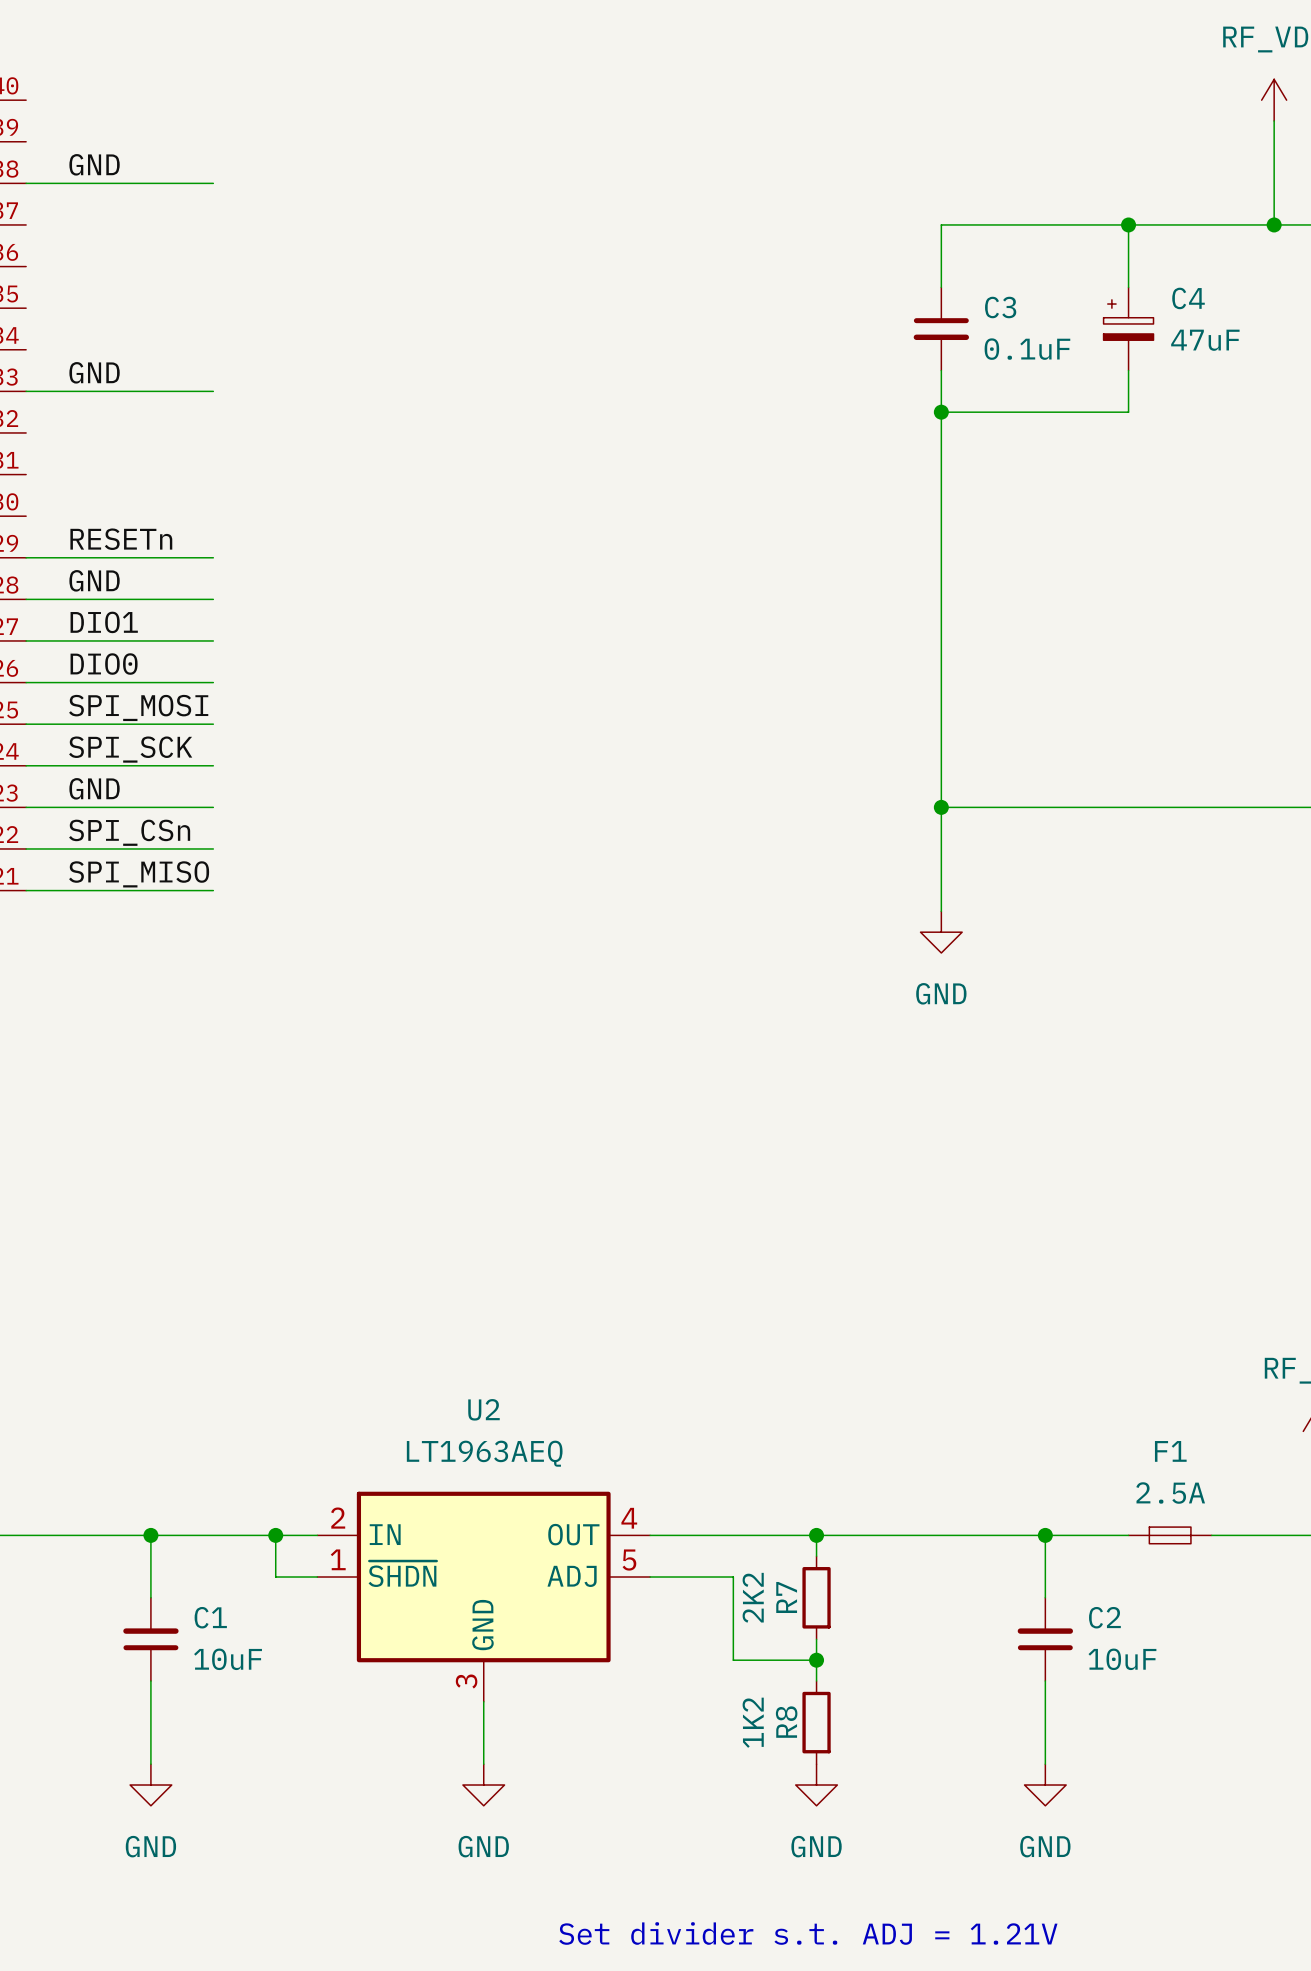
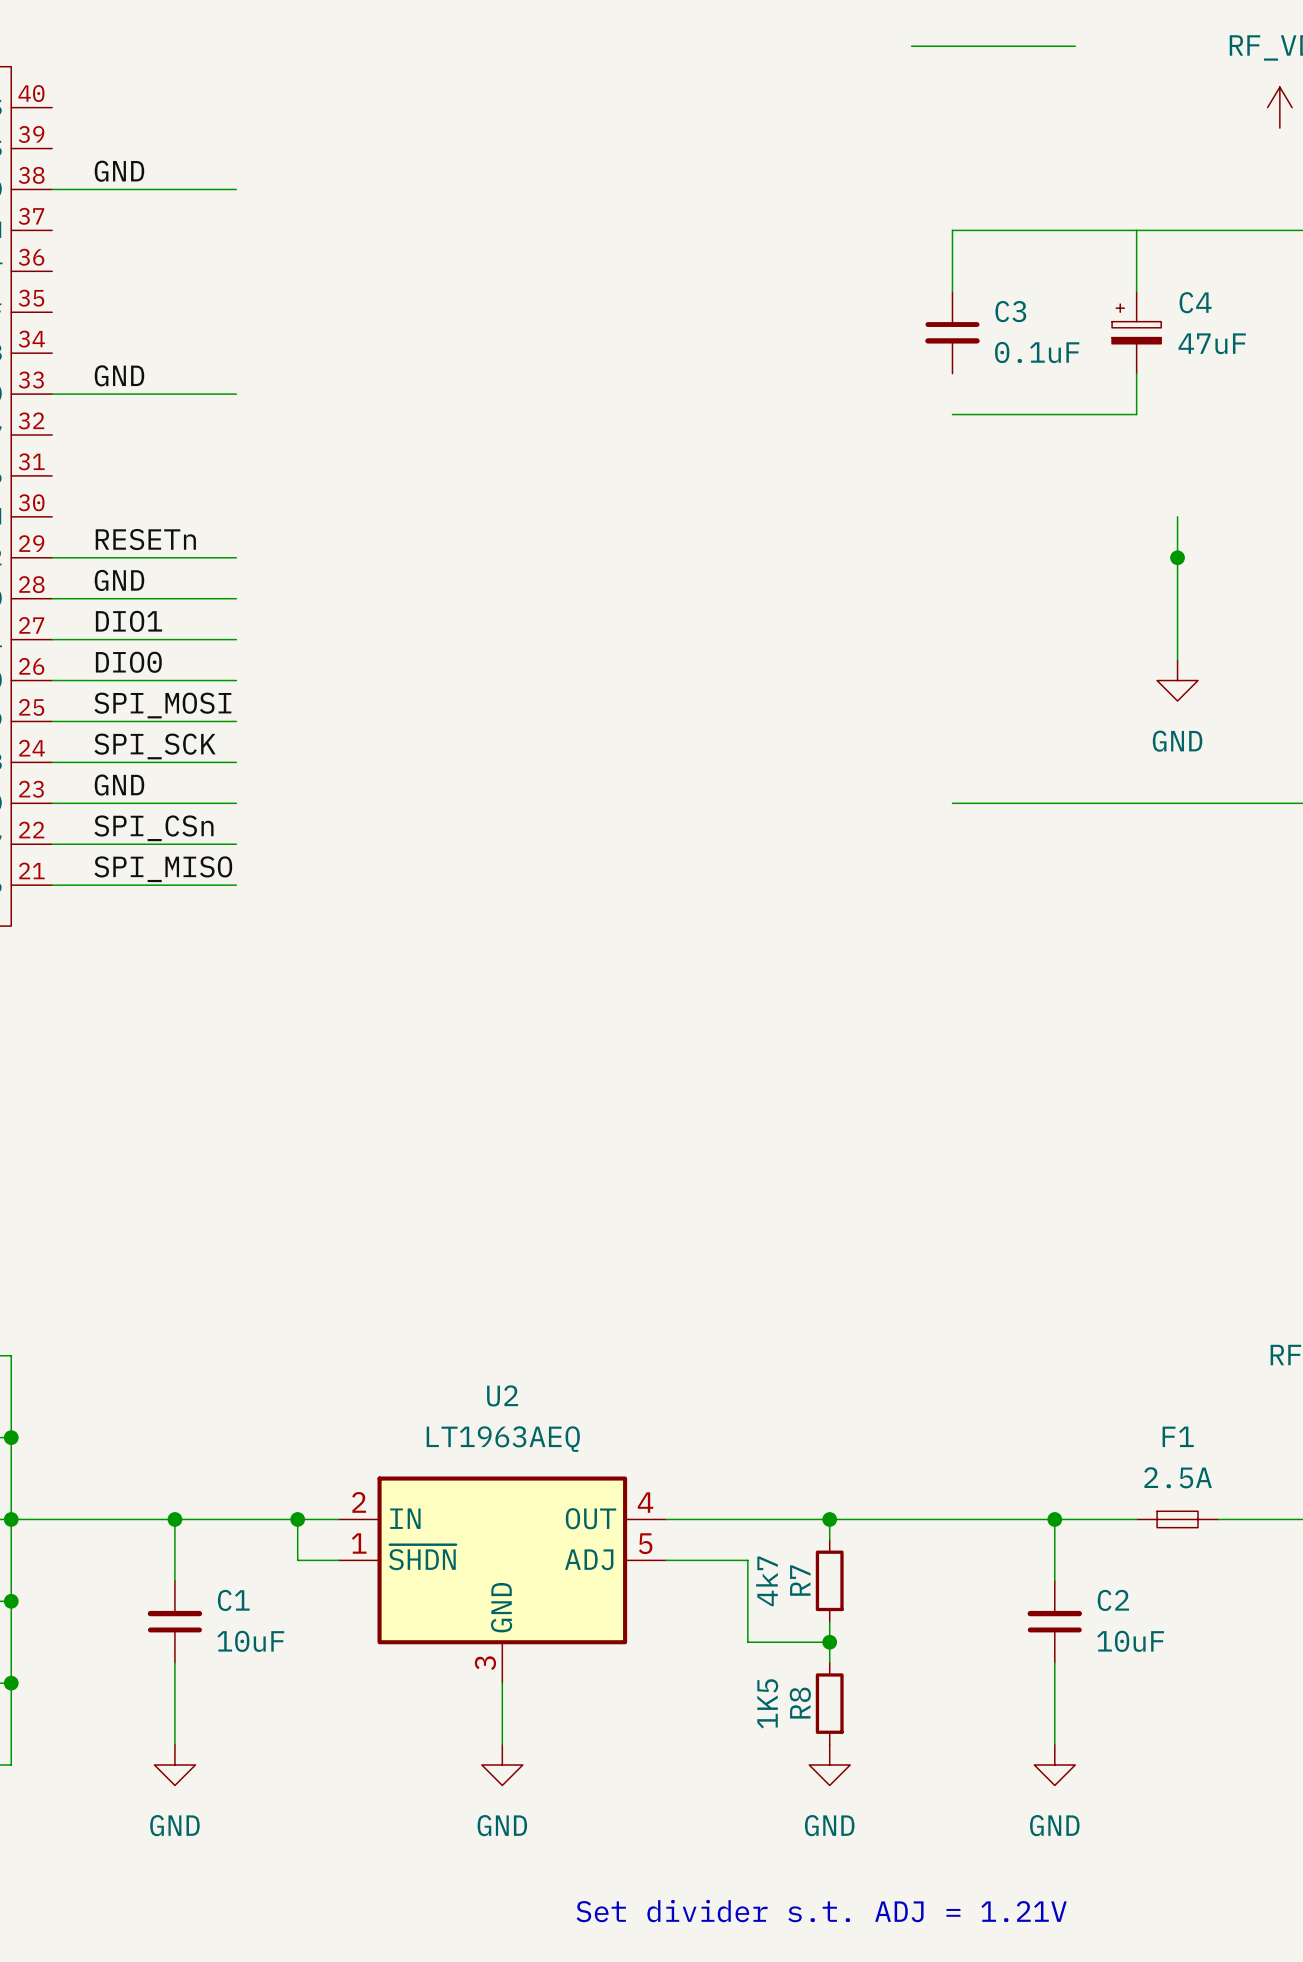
wire: none -> (911, 46) (1075, 46)
wire: (1274, 120) (1274, 224) -> none
junction: (1128, 224) -> none
junction: (1274, 224) -> none
wire: (941, 370) (941, 911) -> none
junction: (941, 412) -> none
wire: none -> (1177, 516) (1177, 660)
junction: none -> (1177, 557)
junction: (941, 807) -> none
power symbol position: GND (941, 932) -> GND (1177, 680)
R7 value: 2K2 (753, 1597) -> 4k7 (766, 1581)
R8 value: 1K2 (753, 1722) -> 1K5 (767, 1703)

